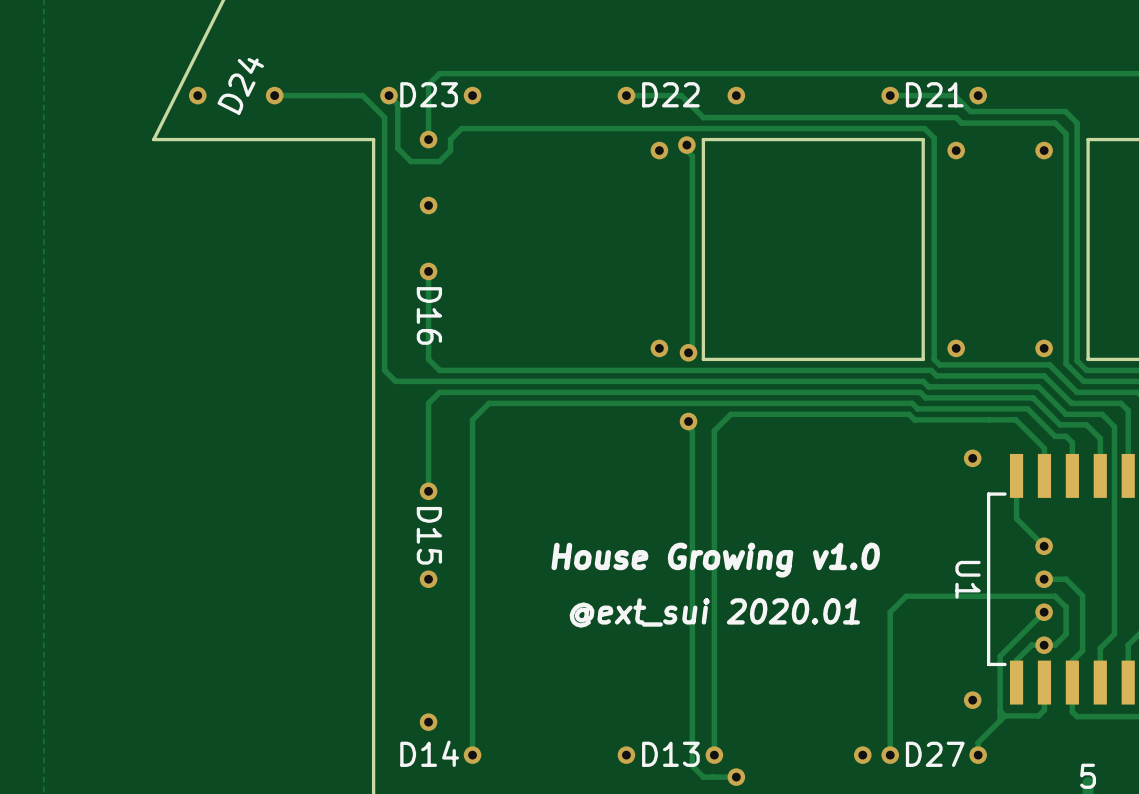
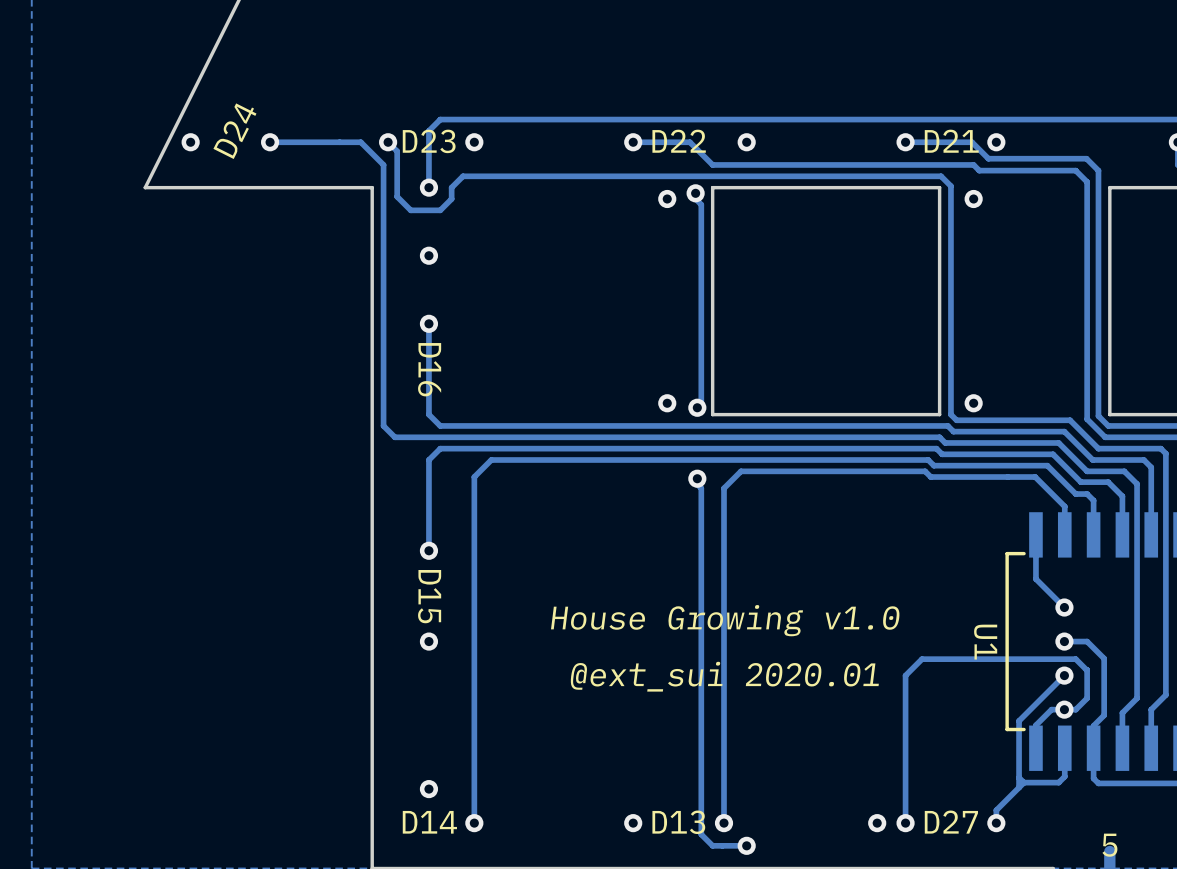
via: (1044, 150) -> none
via: (1044, 348) -> none
via: (972, 458) -> none
via: (972, 700) -> none

